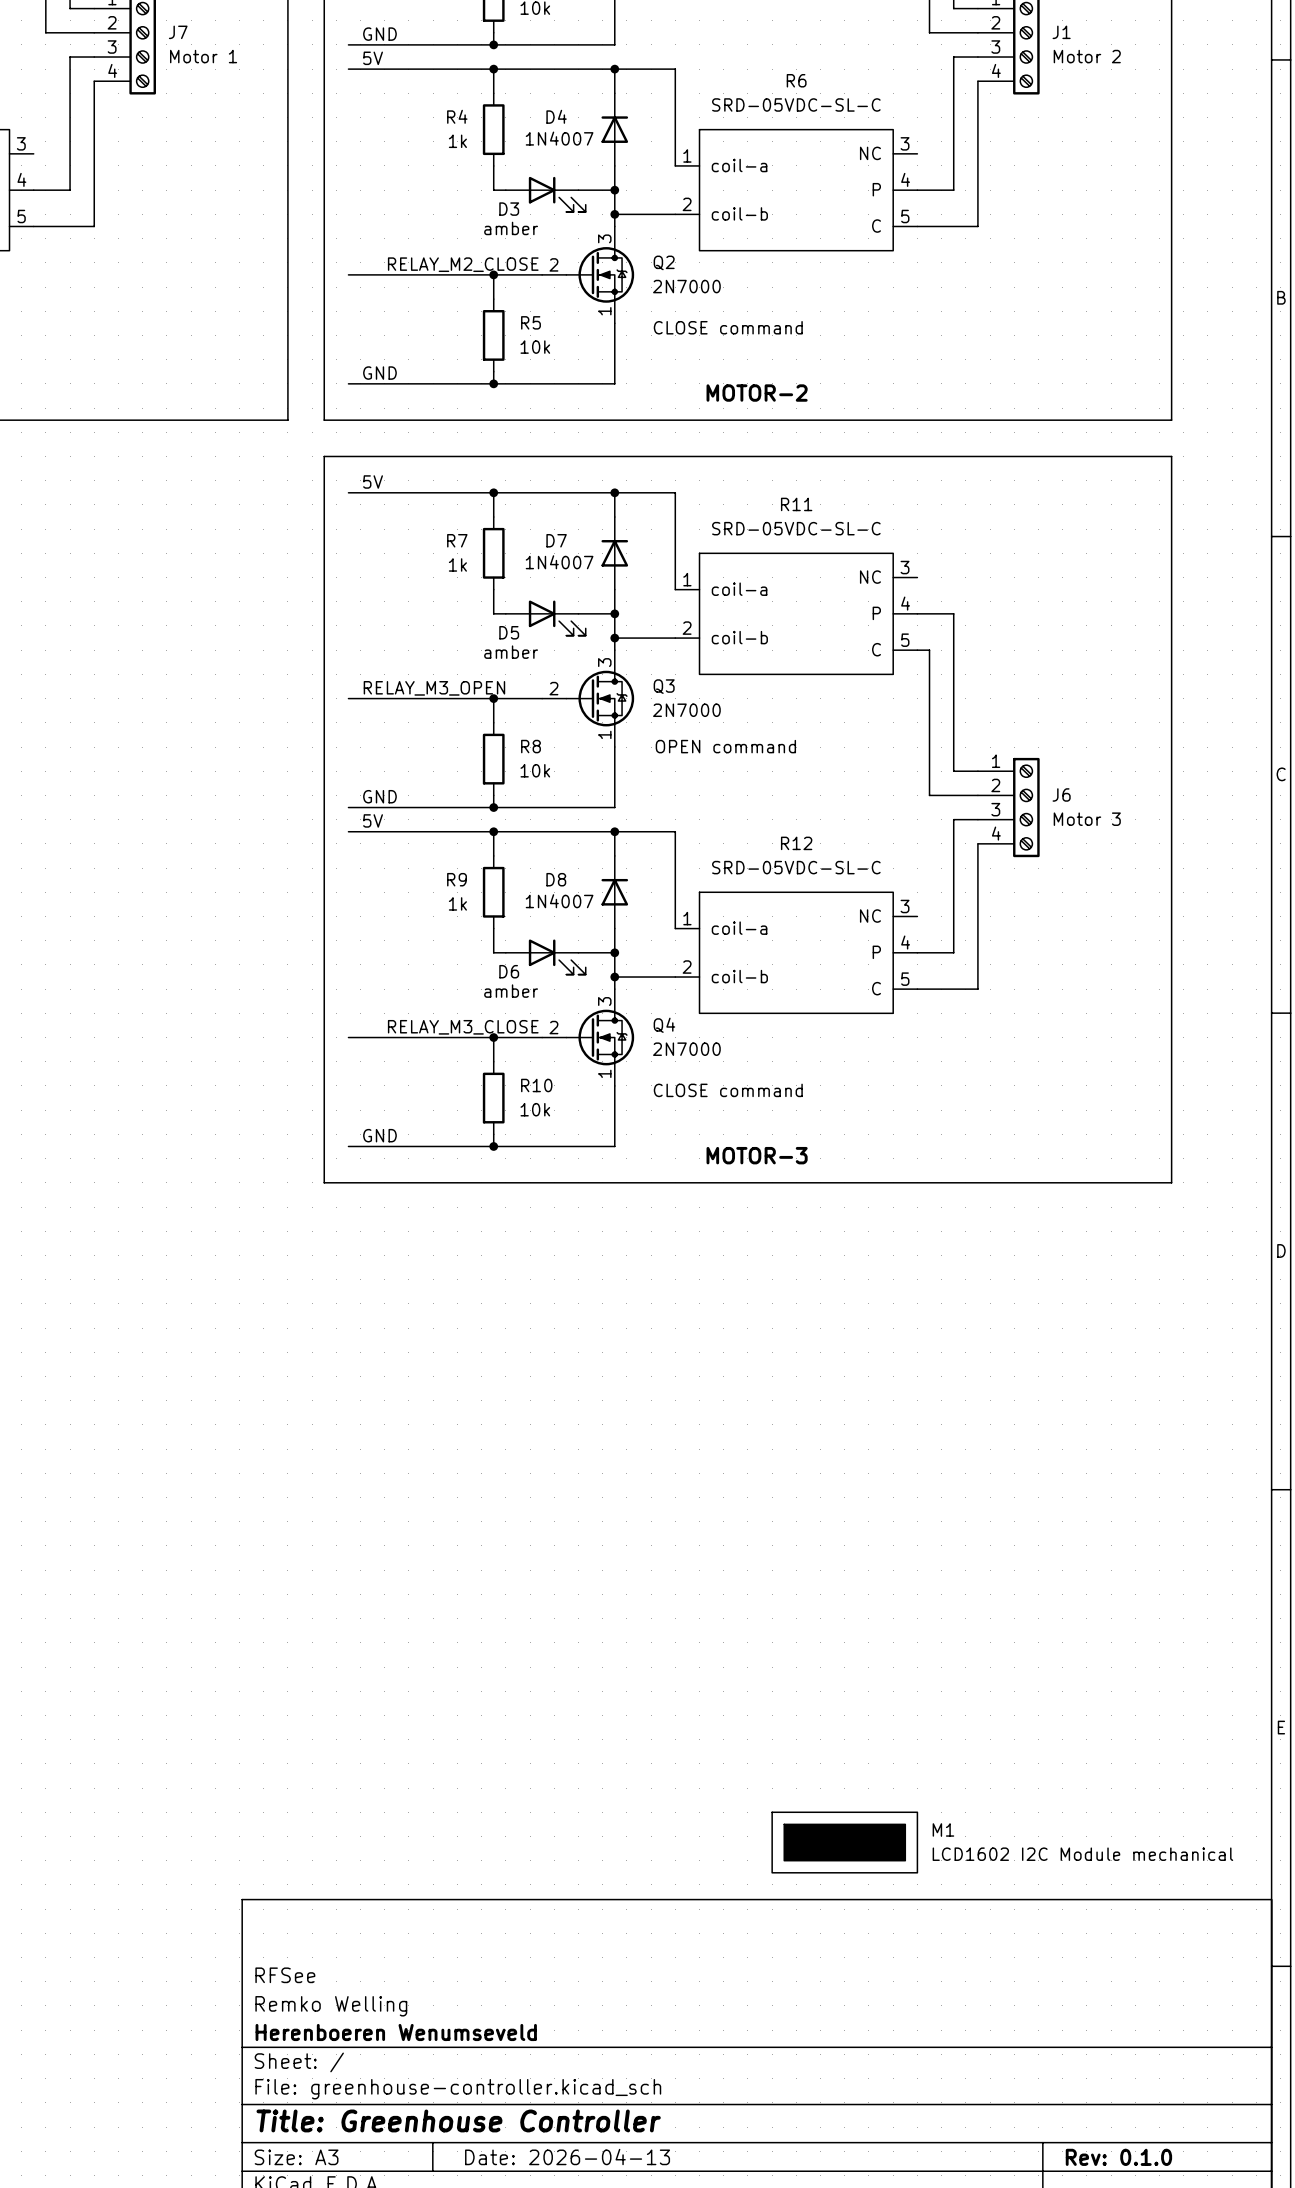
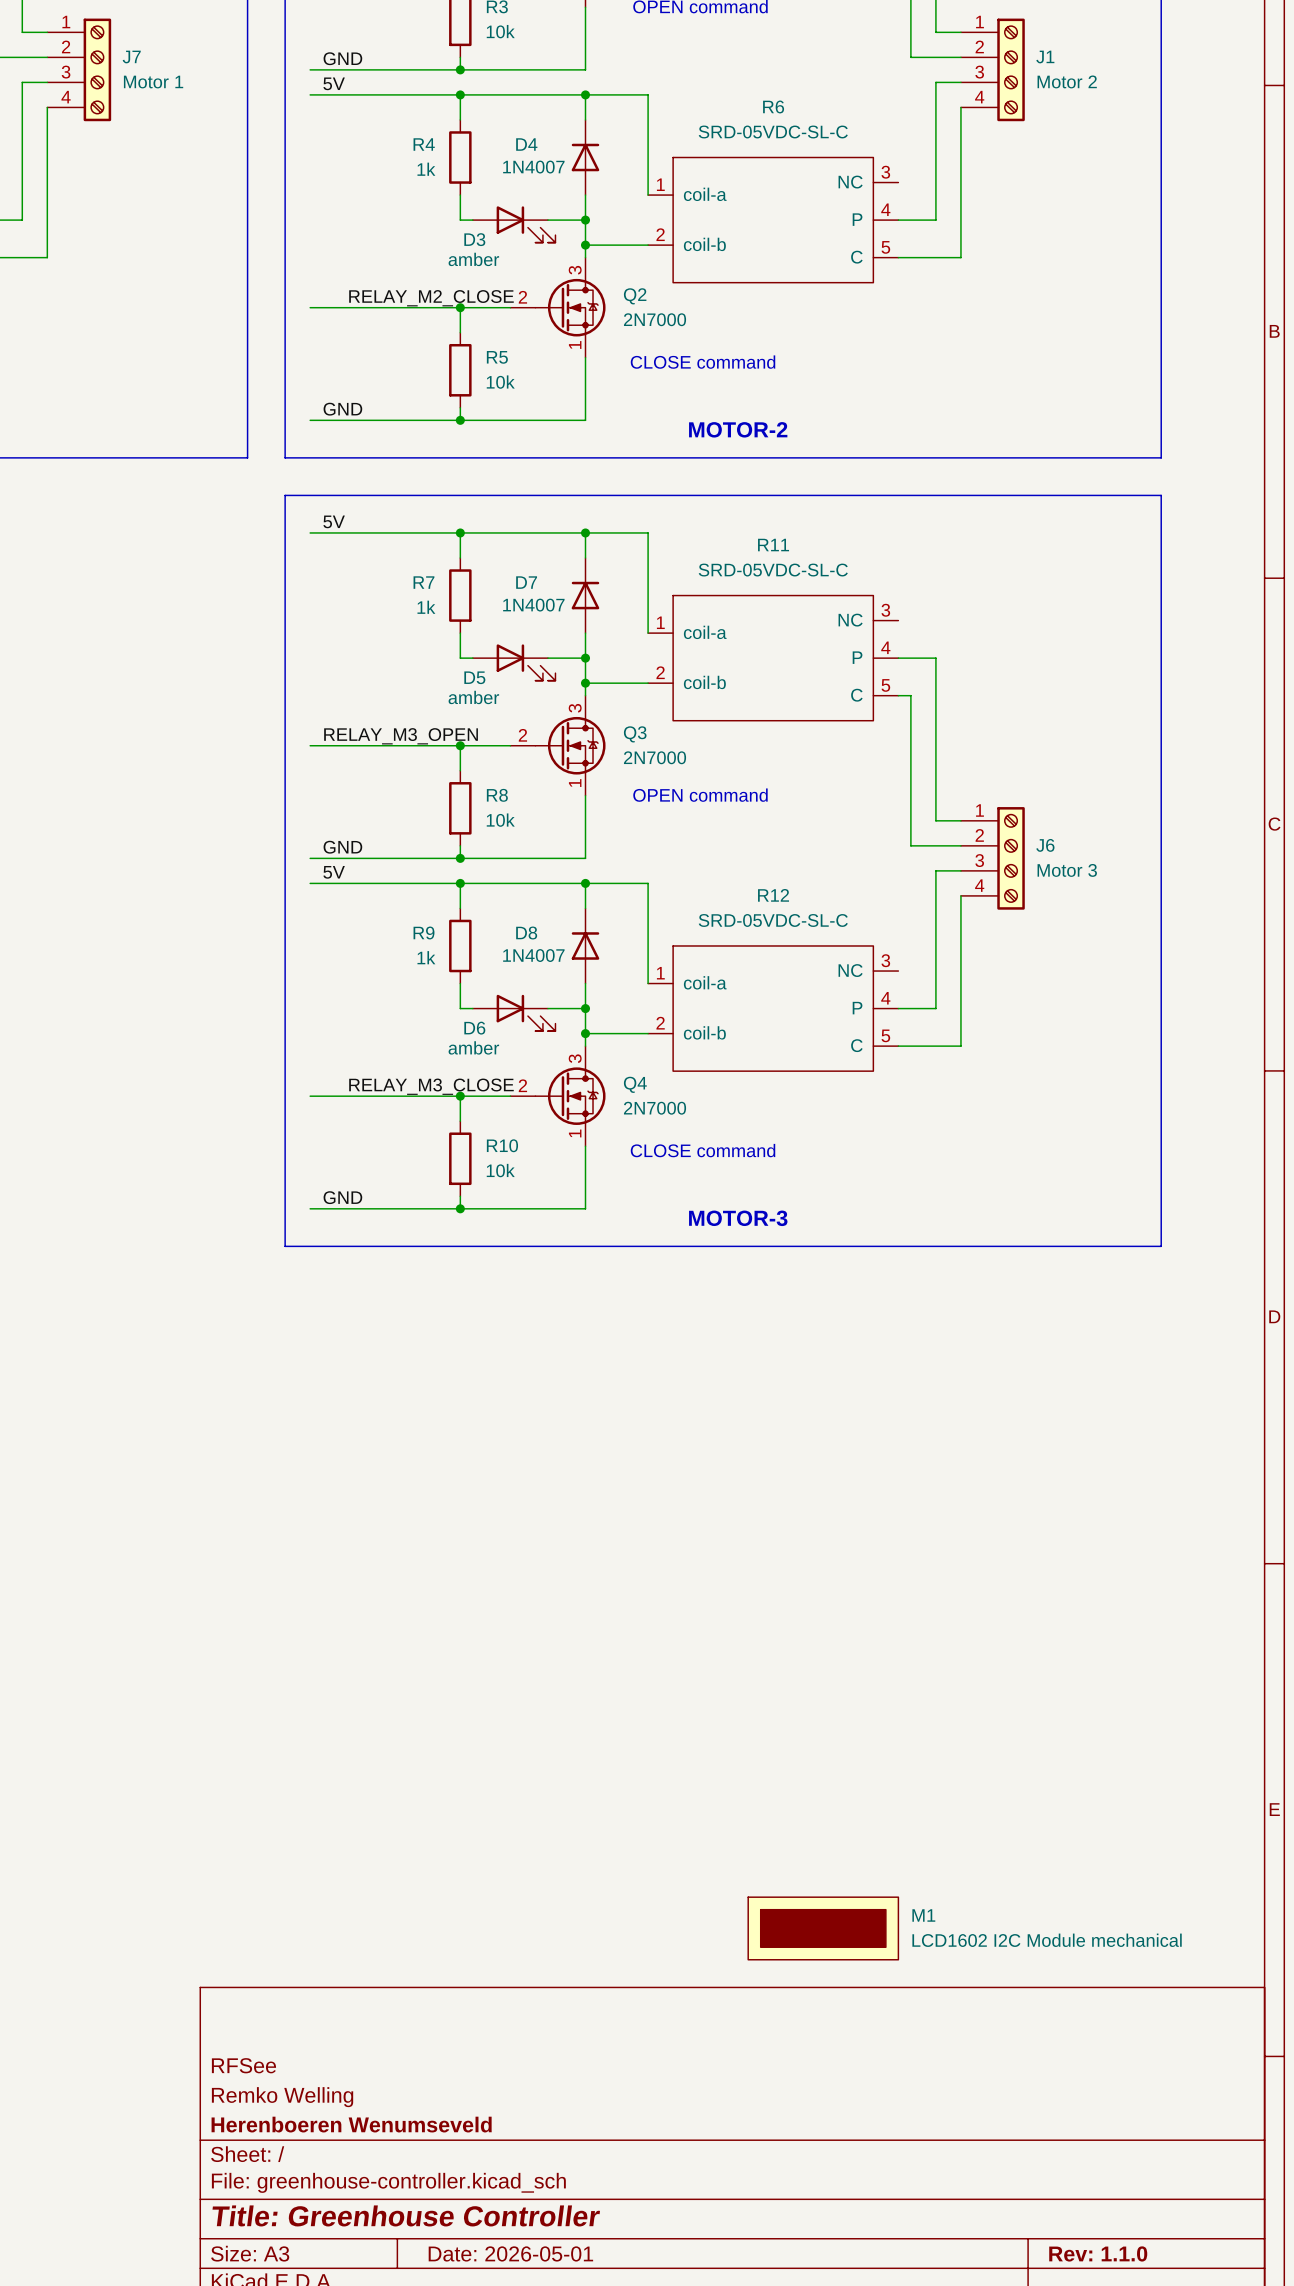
title block: Date: 2026-04-13 (567, 2157) -> Date: 2026-05-01 (510, 2253)
title block: Rev: 0.1.0 (1118, 2157) -> Rev: 1.1.0 (1098, 2253)

